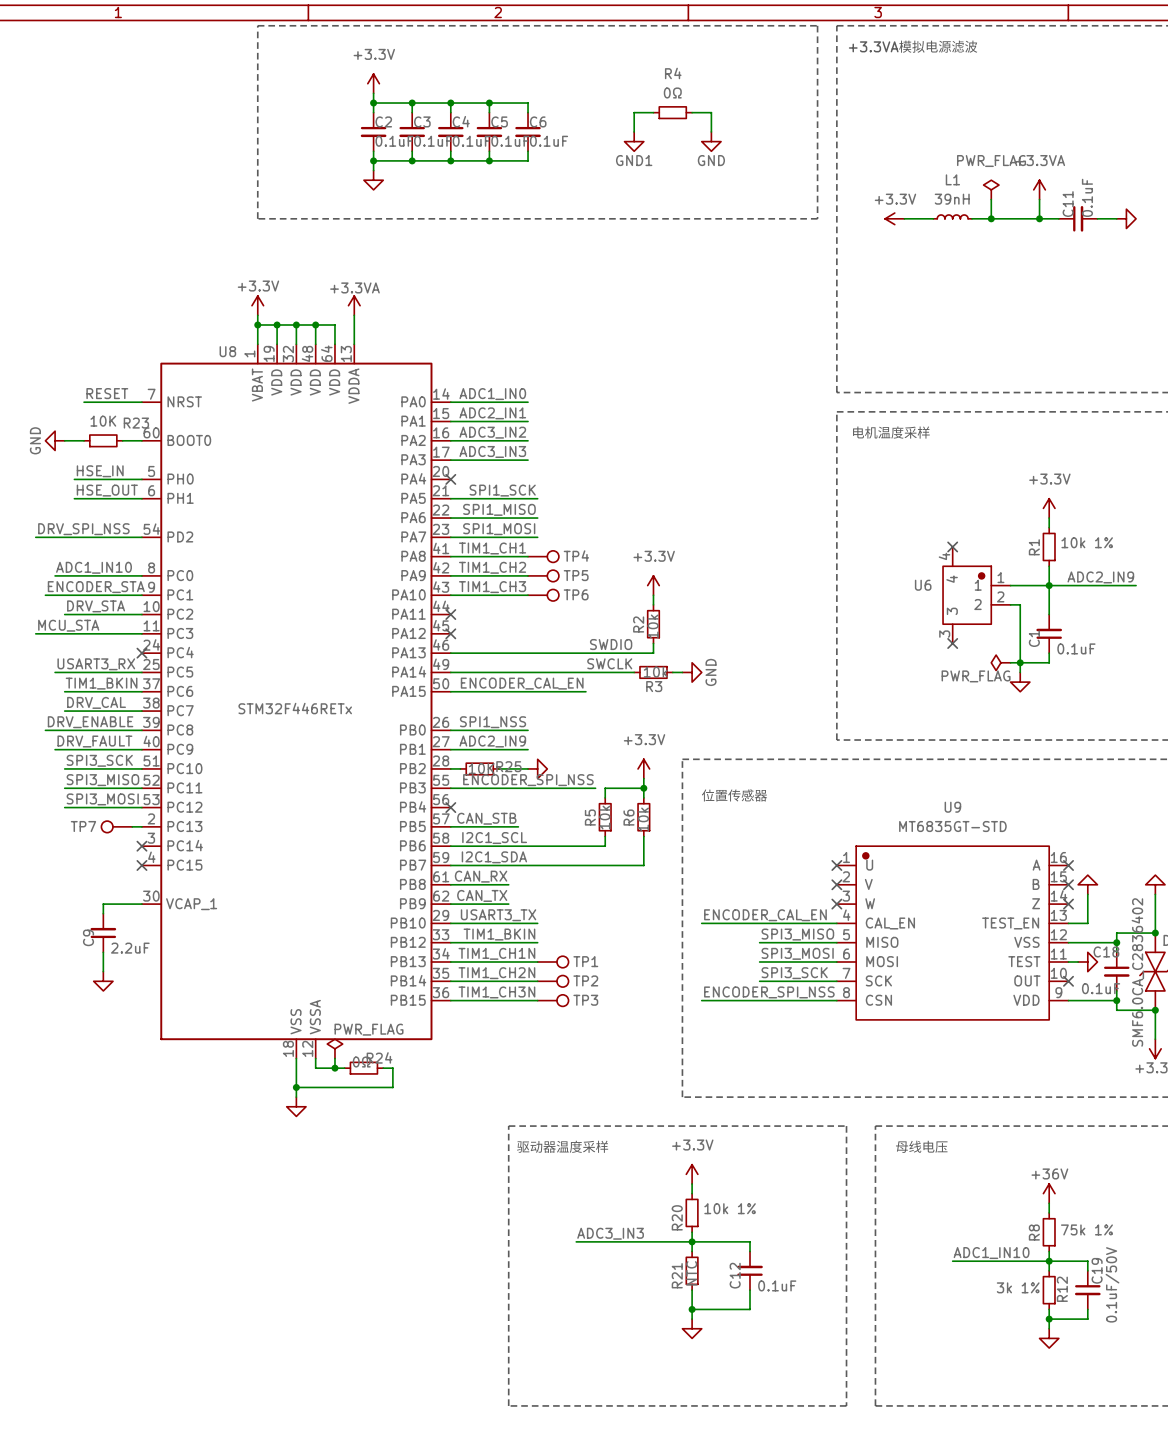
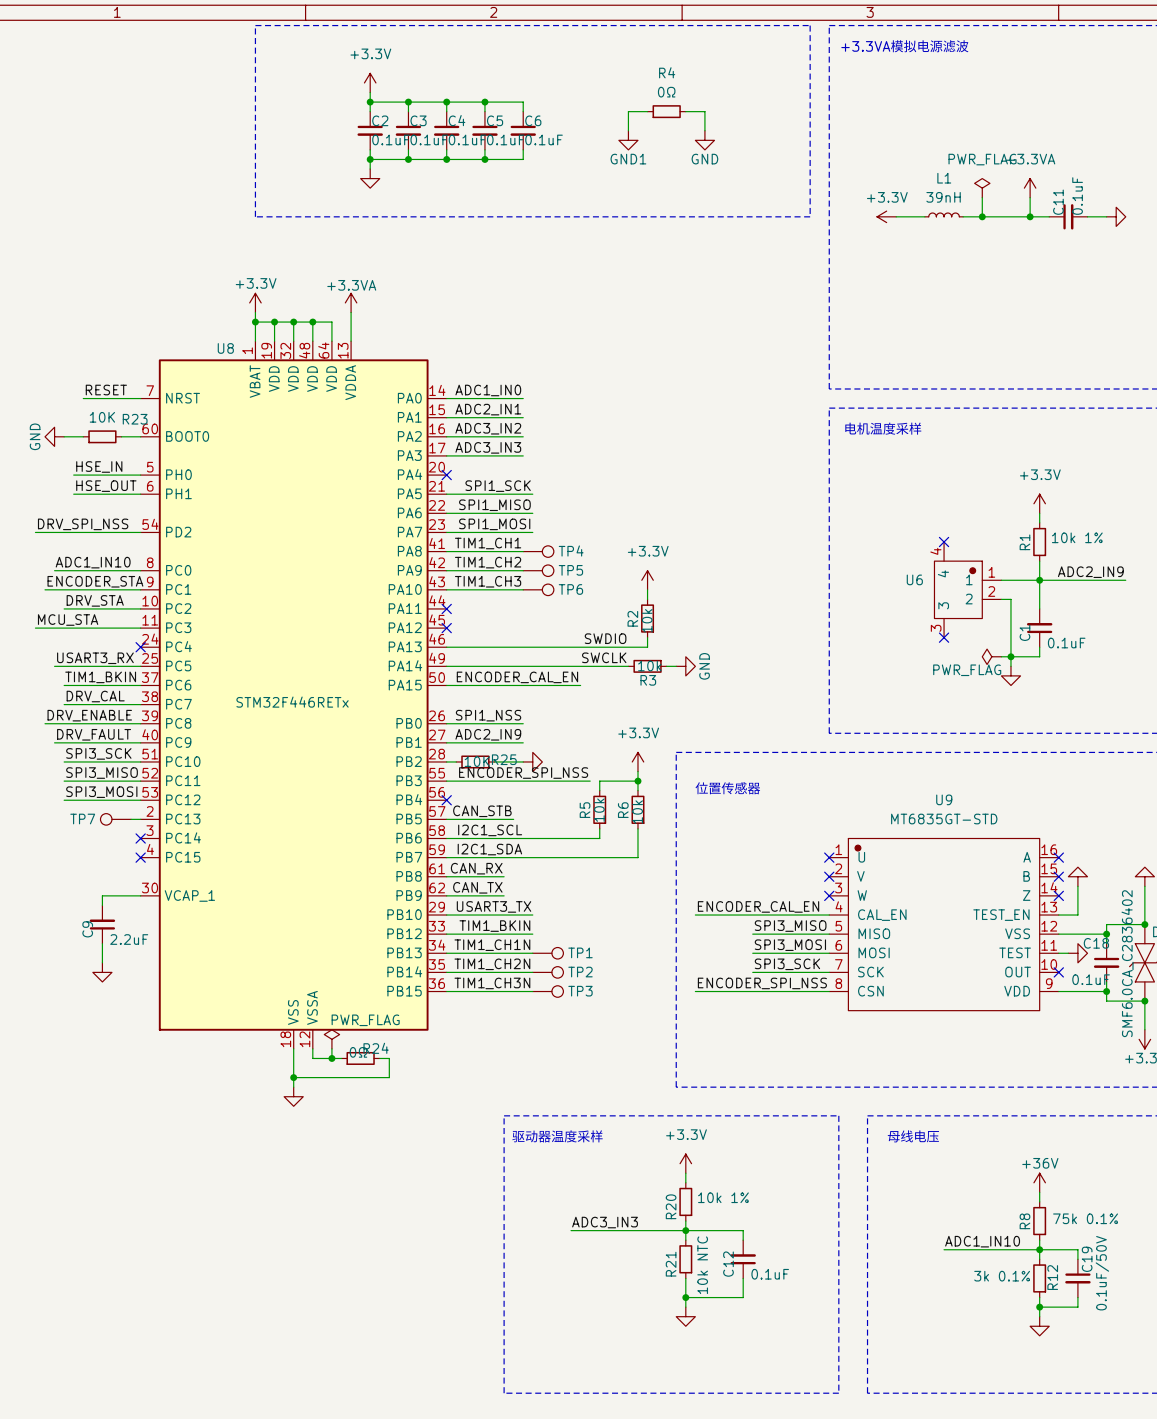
R8 value: 75k 1% (1086, 1229) -> 75k 0.1% (1085, 1218)
R21 value: NTC (691, 1273) -> 10k NTC (702, 1265)
R12 value: 3k 1% (1018, 1287) -> 3k 0.1% (1002, 1276)

